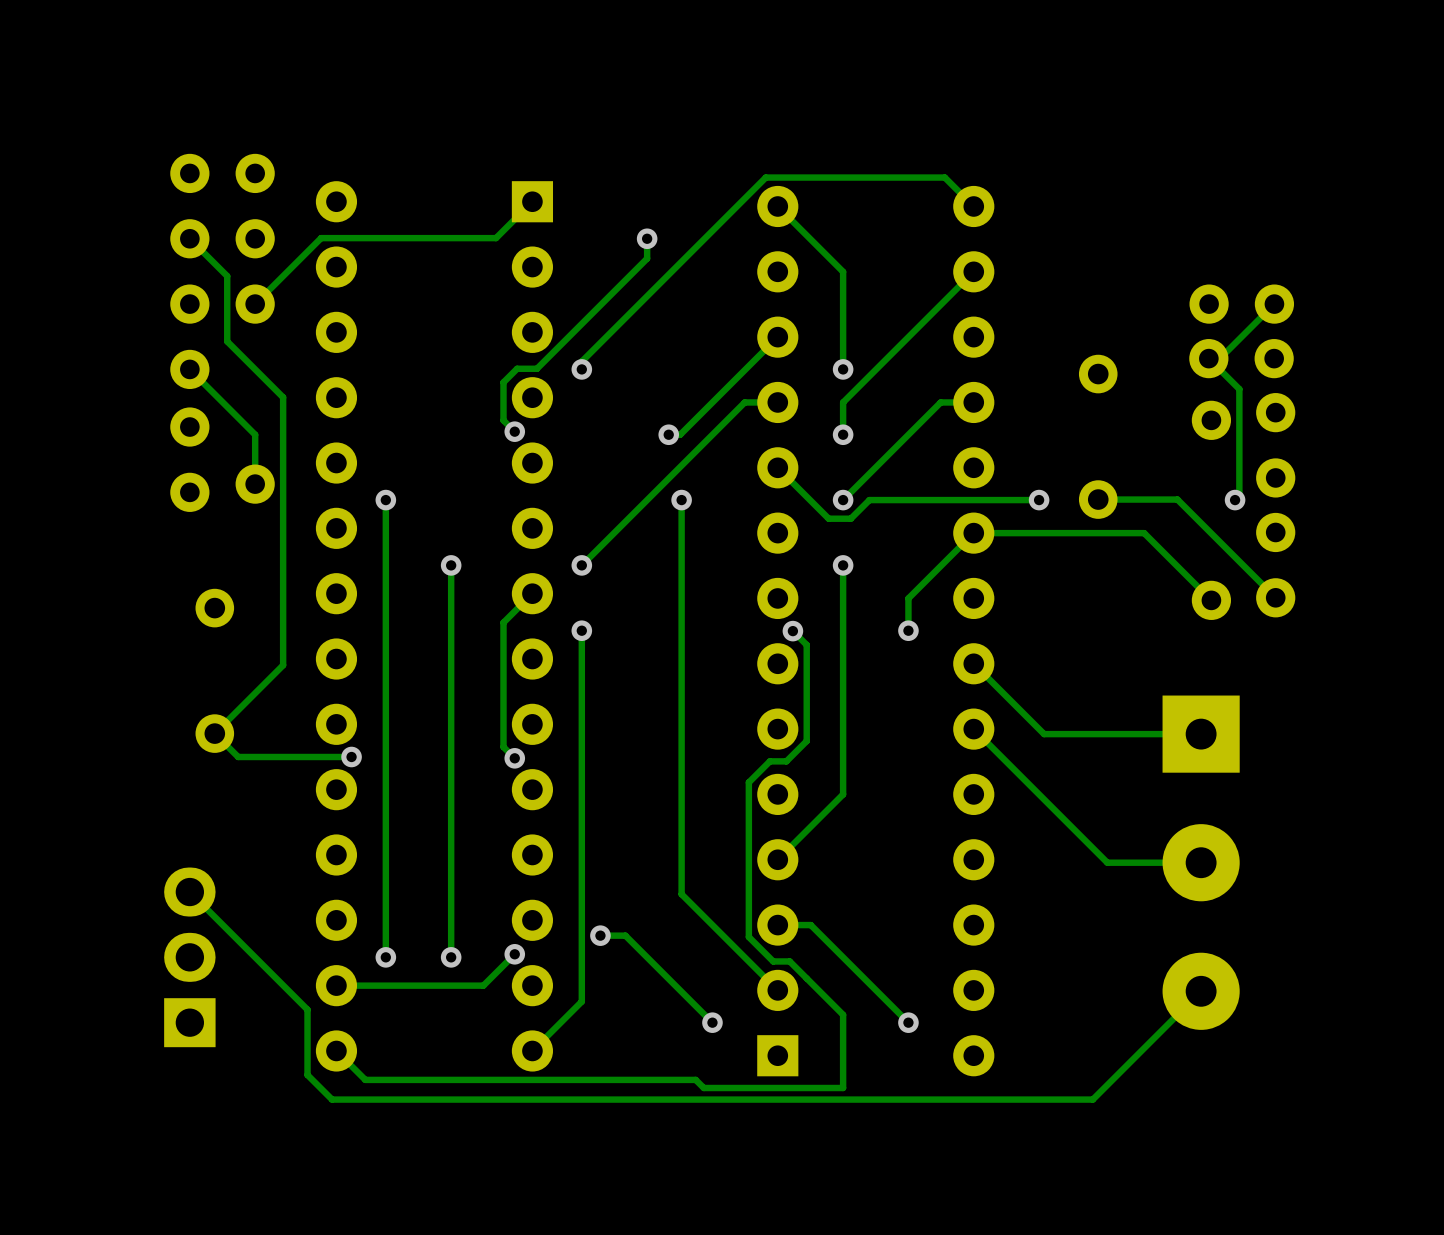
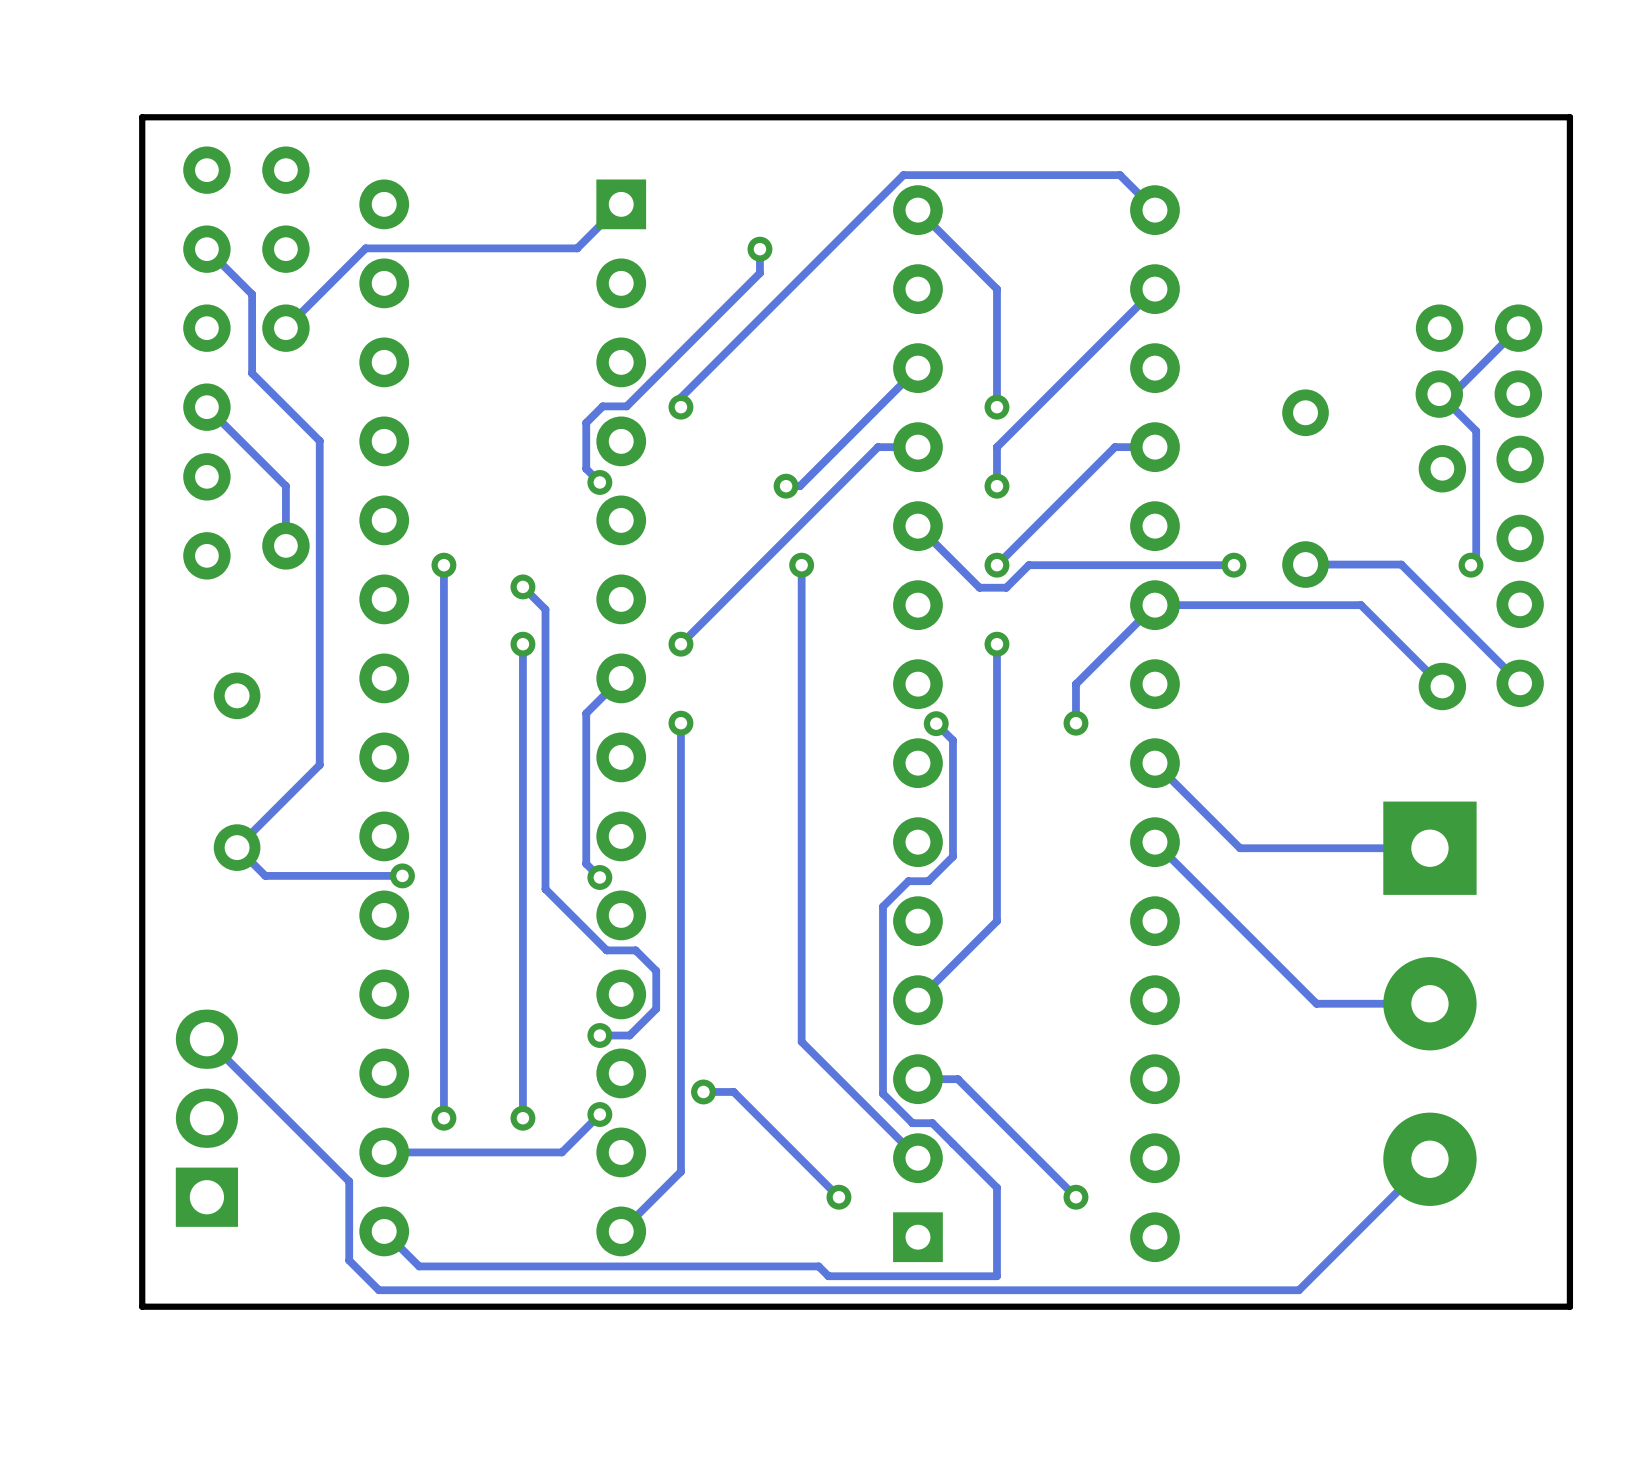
board edge: none -> (1569, 117) (142, 117) (142, 1306) (1569, 1306) (1569, 117)
track: none -> (522, 586) (545, 609) (545, 889) (606, 950) (635, 950) (656, 970) (656, 1008) (629, 1035) (599, 1035)
via: none -> (522, 586)
via: none -> (599, 1035)

